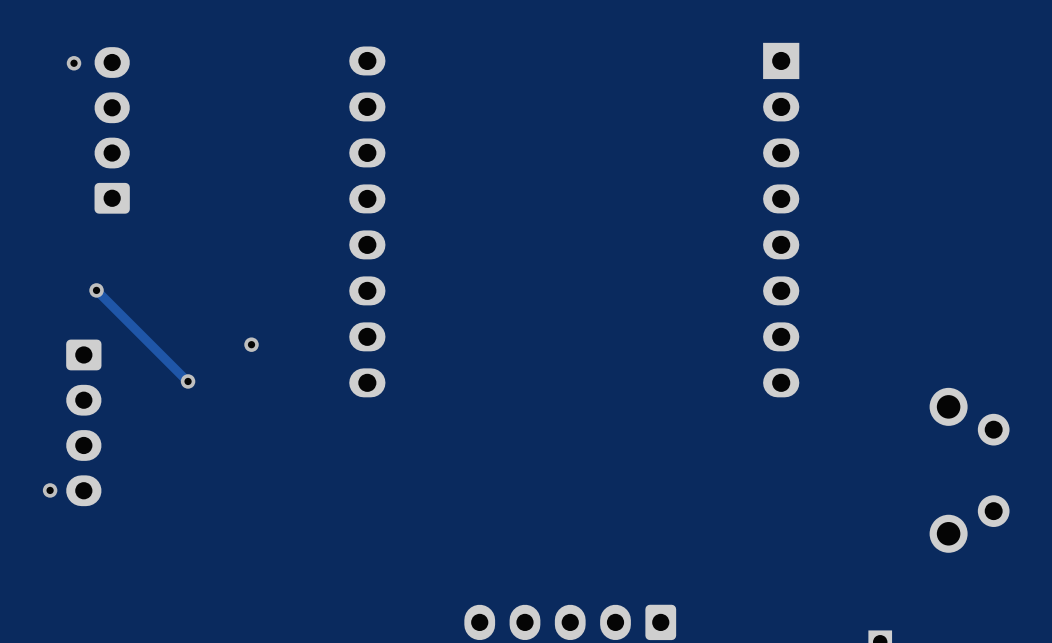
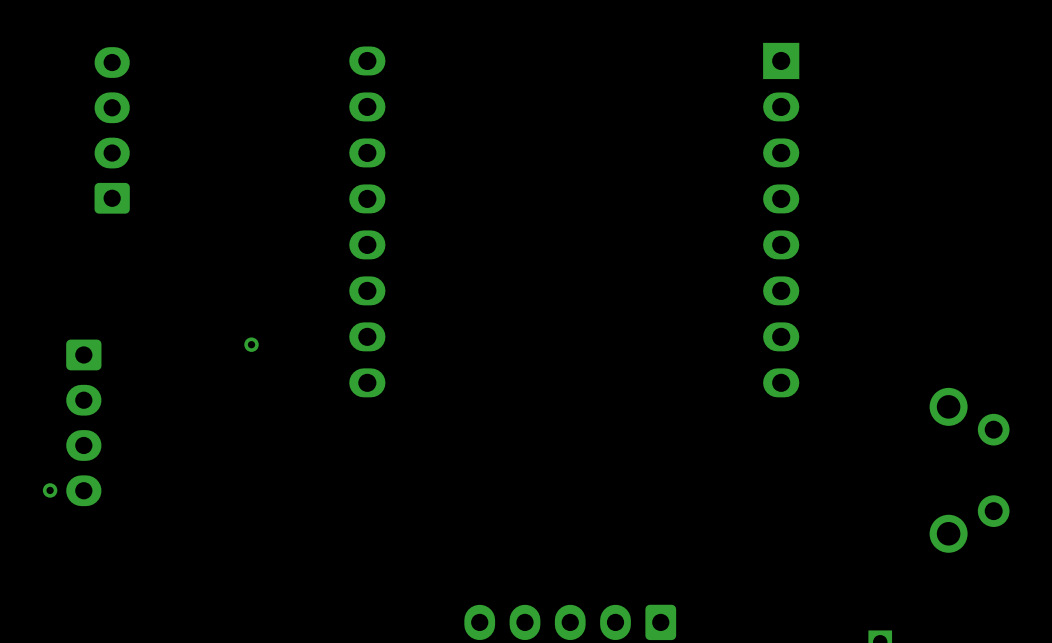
via: (74, 63) -> none
track: (96, 290) (188, 381) -> none
via: (96, 290) -> none
via: (188, 381) -> none

